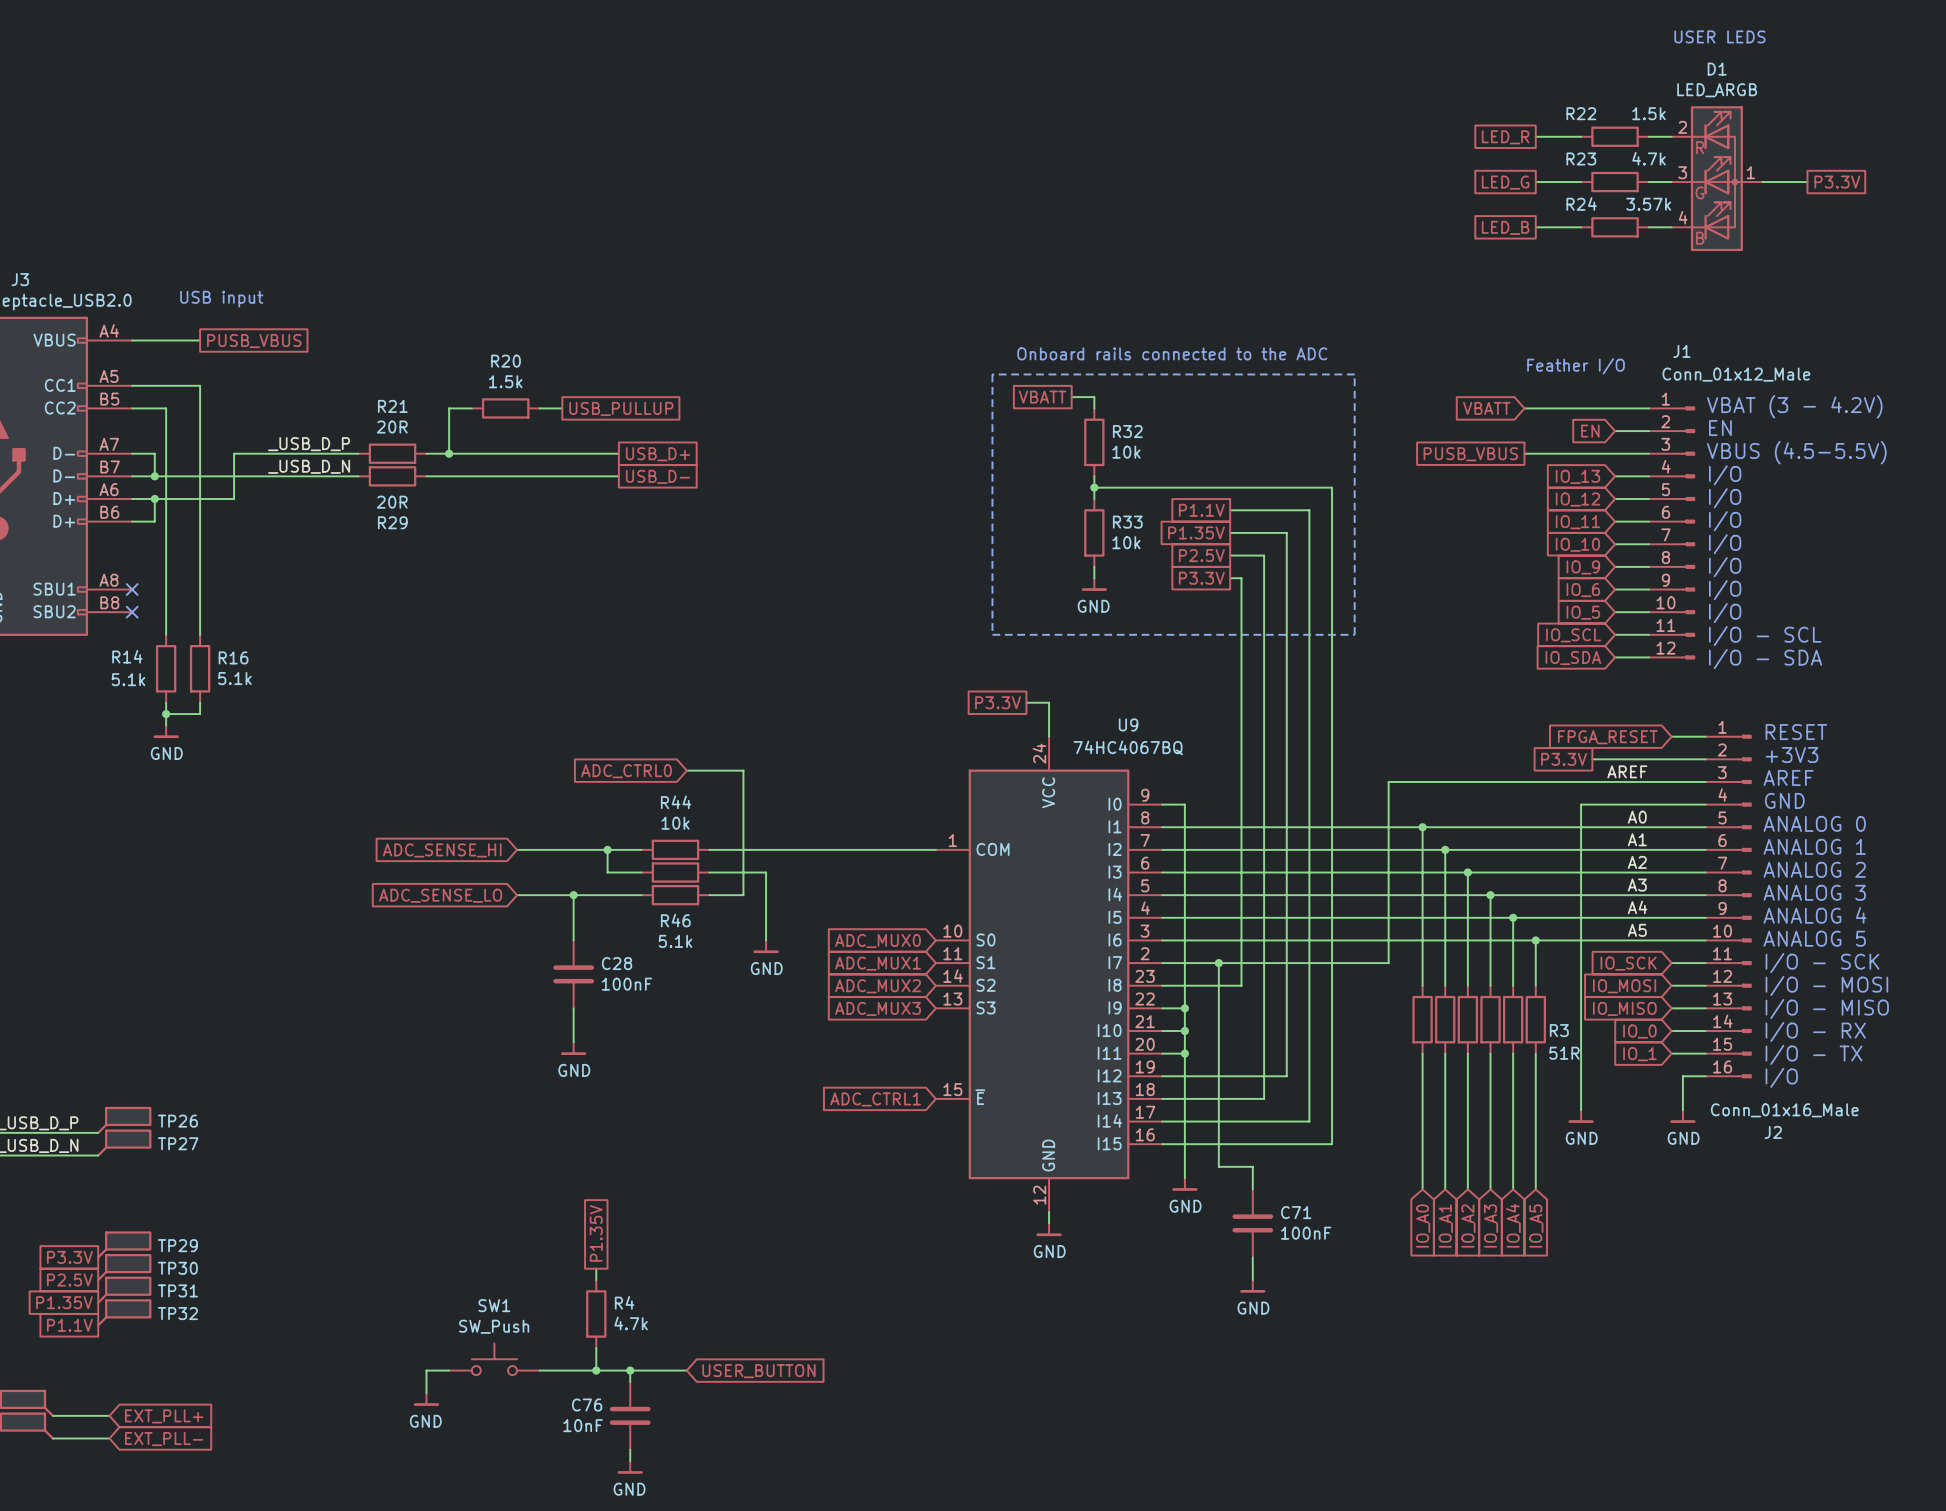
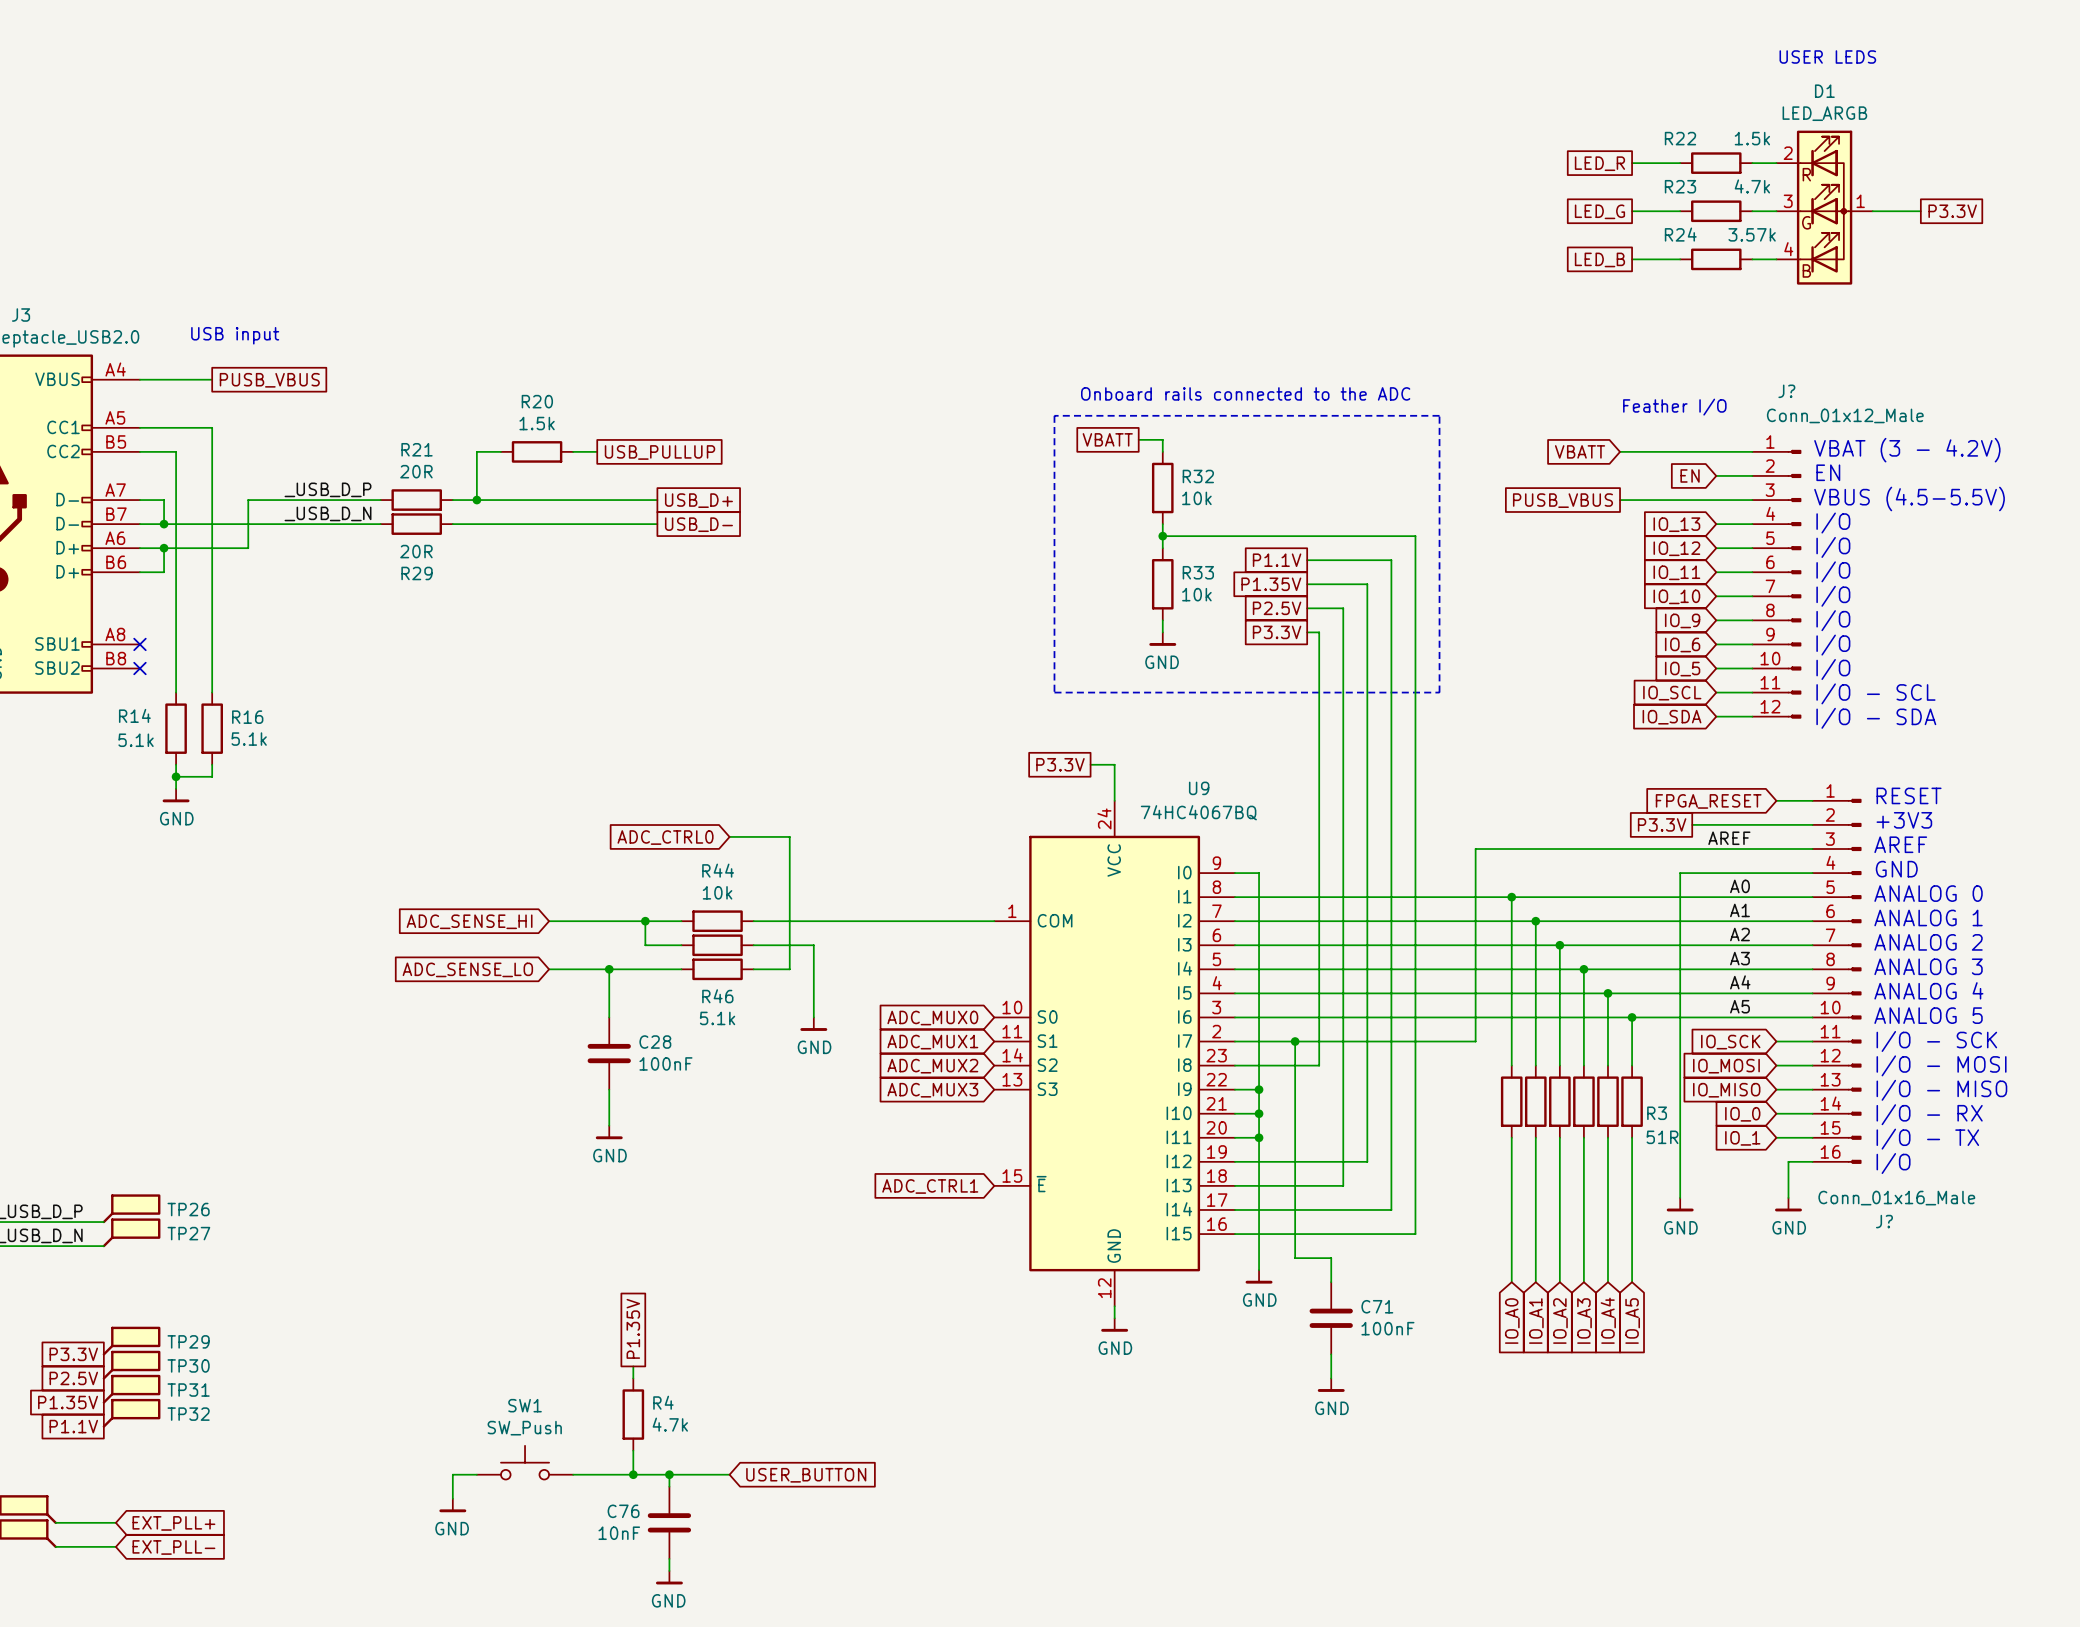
J1 name: J1 (1681, 351) -> J? (1786, 391)
J2 name: J2 (1773, 1132) -> J? (1884, 1221)

